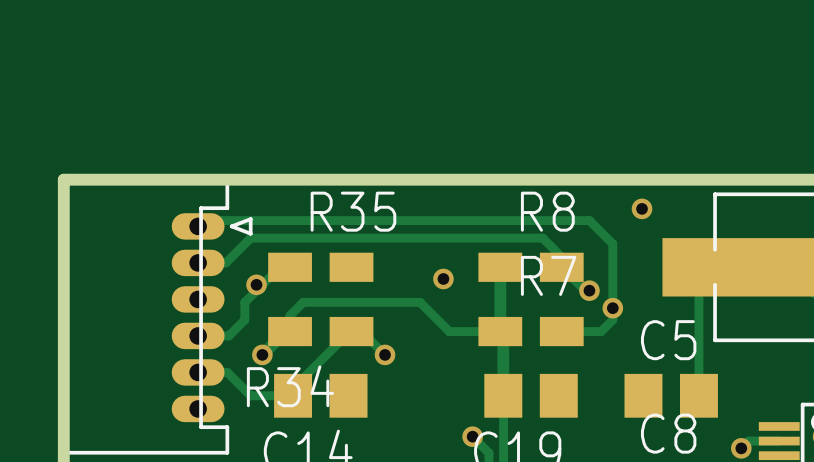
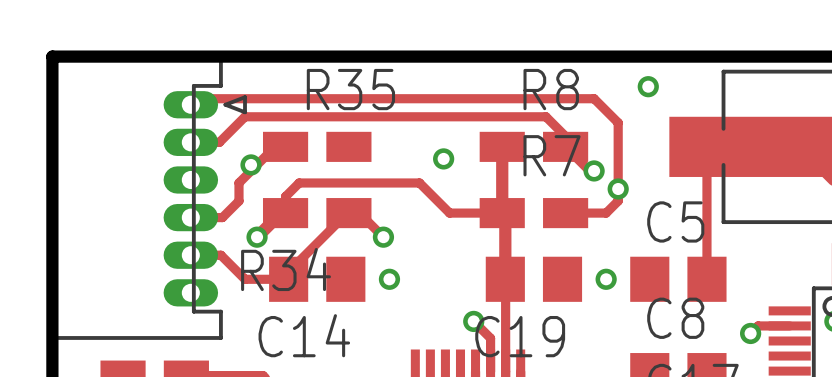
via: none -> (389, 279)
via: none -> (606, 279)

